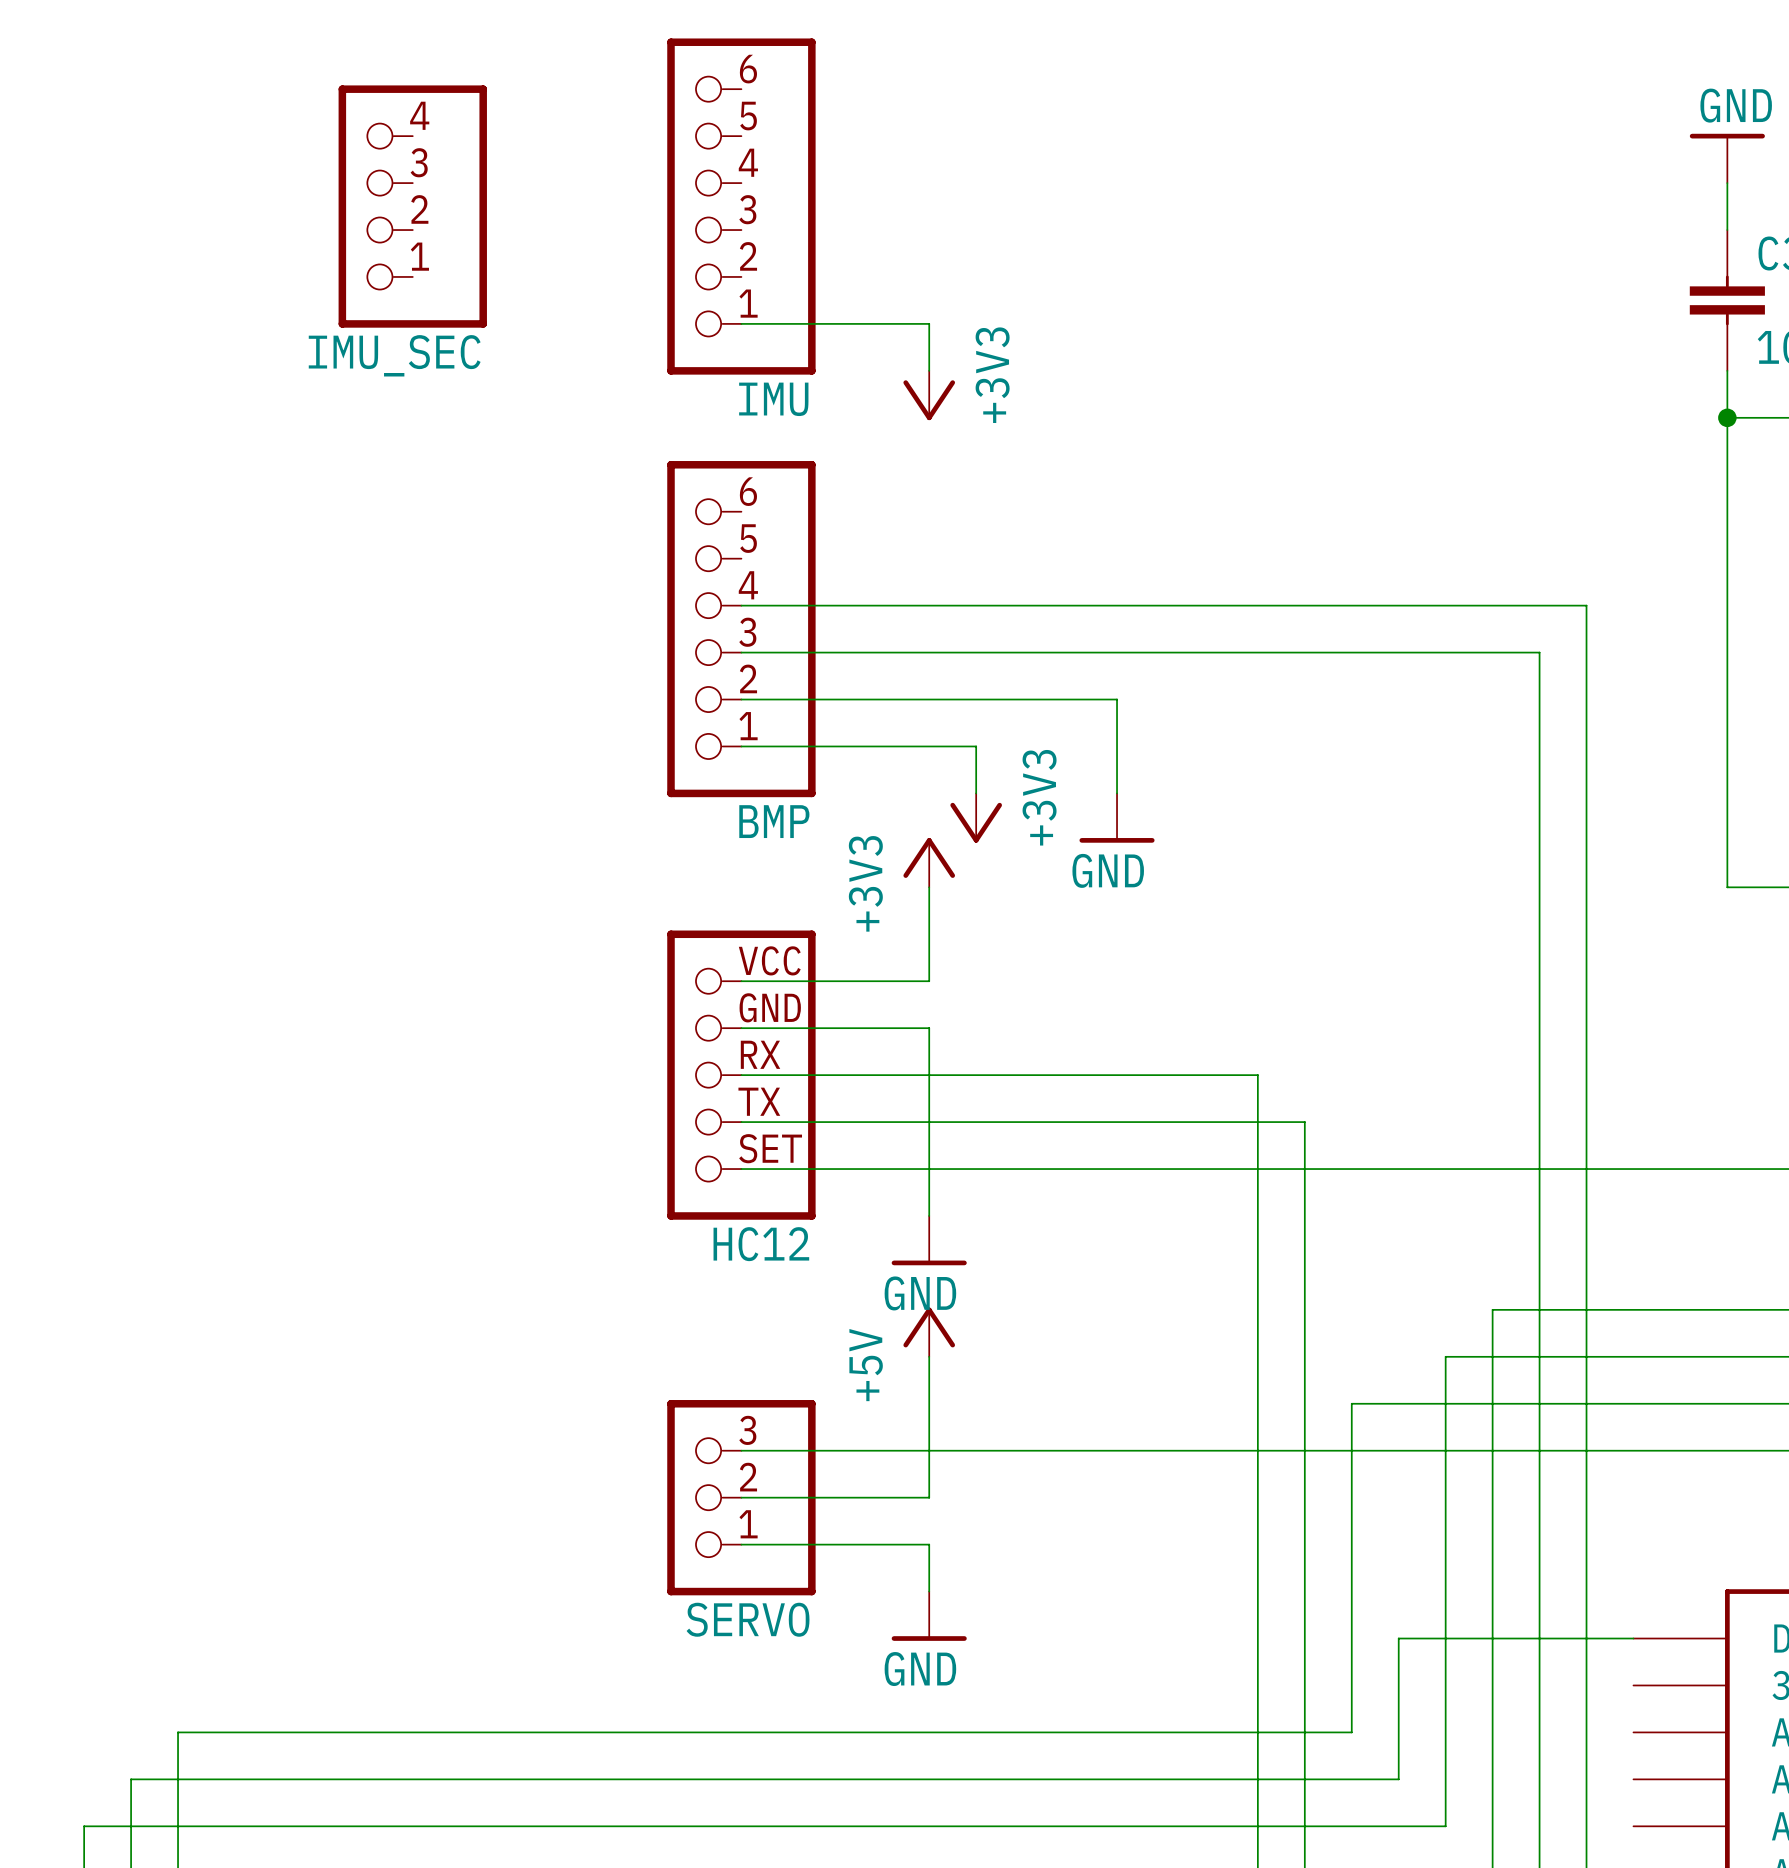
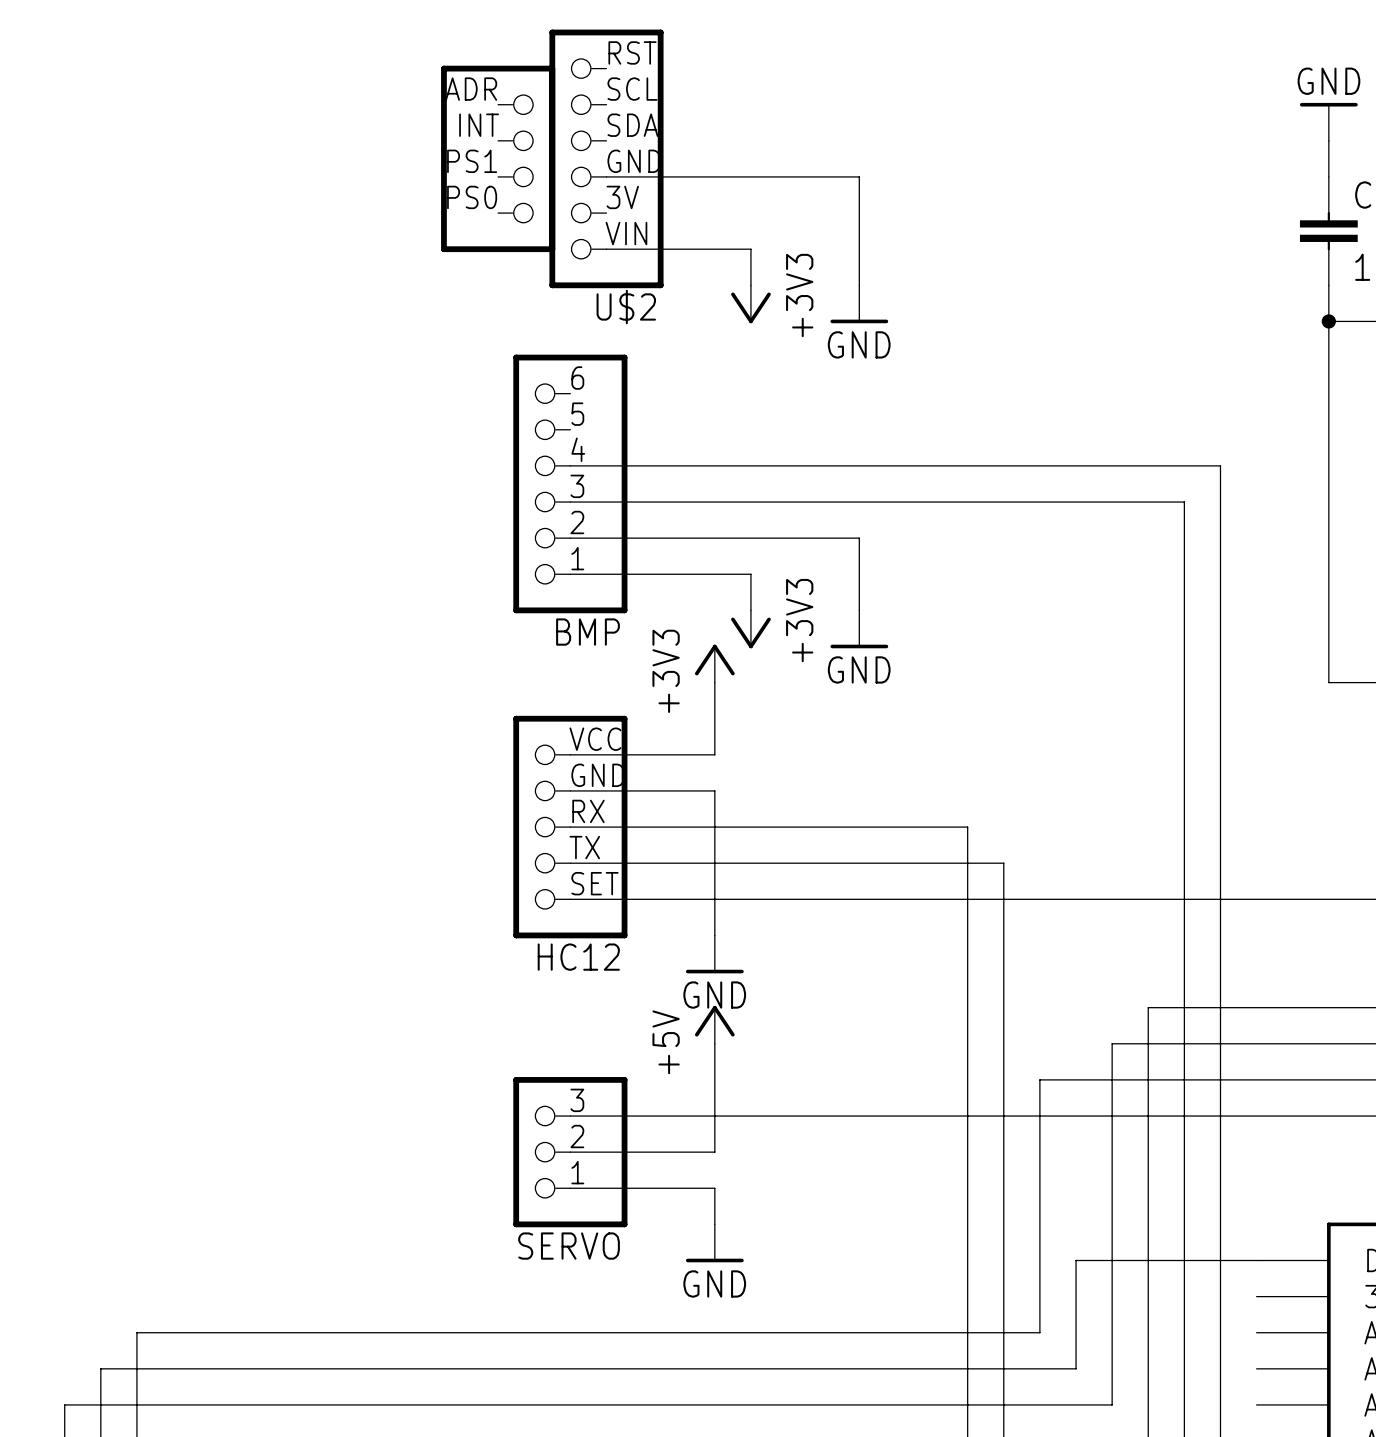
IMU_SEC: (412, 206) -> none
U$2: none -> (552, 158)
IMU: (741, 206) -> none
wire: none -> (606, 176) (859, 176) (859, 285)
wire: (741, 323) (788, 323) -> none
wire: (929, 323) (929, 370) -> (714, 249) (750, 249) (750, 285)
power symbol position: +3V3 (929, 395) -> +3V3 (750, 304)
power symbol: none -> GND (859, 304)

